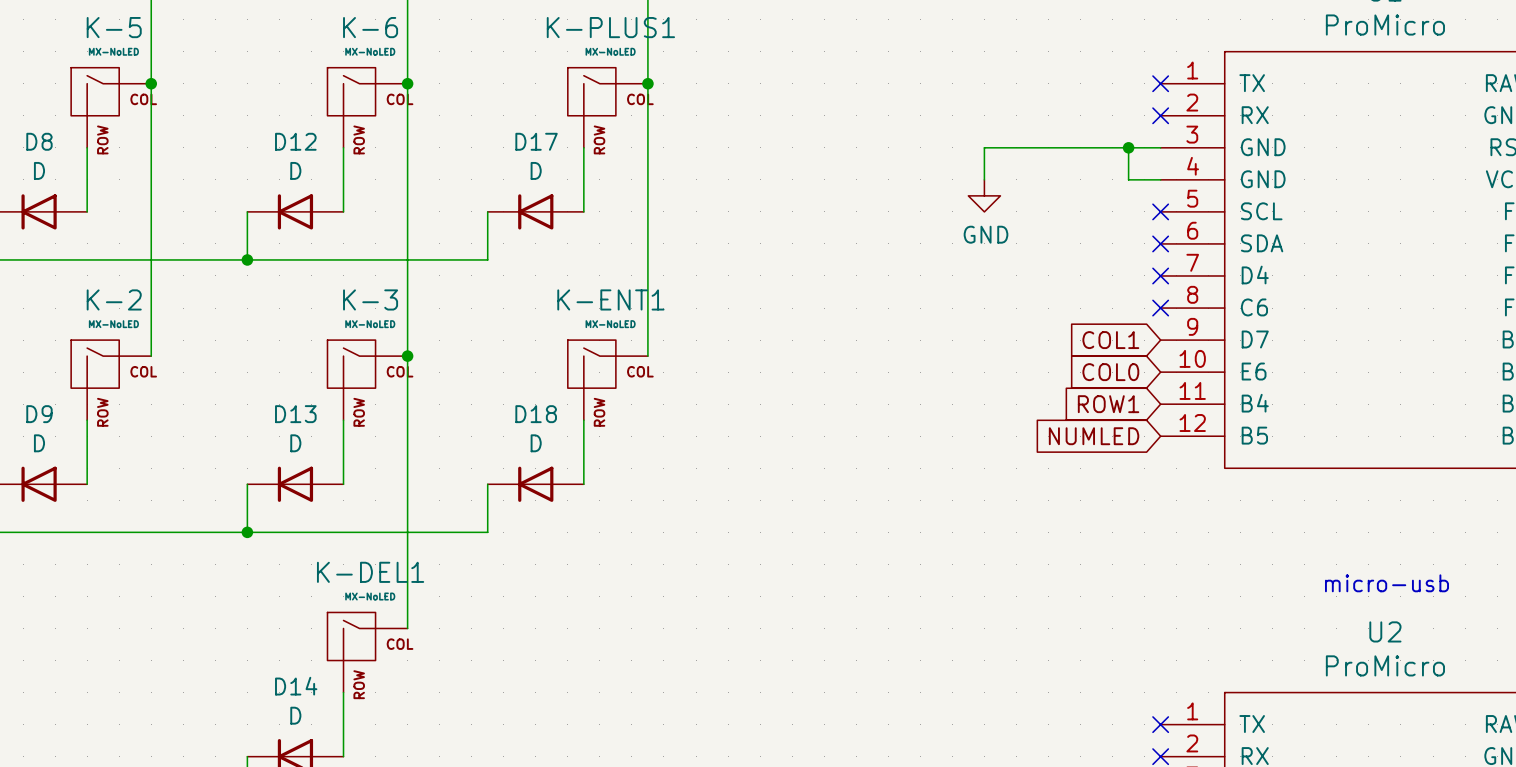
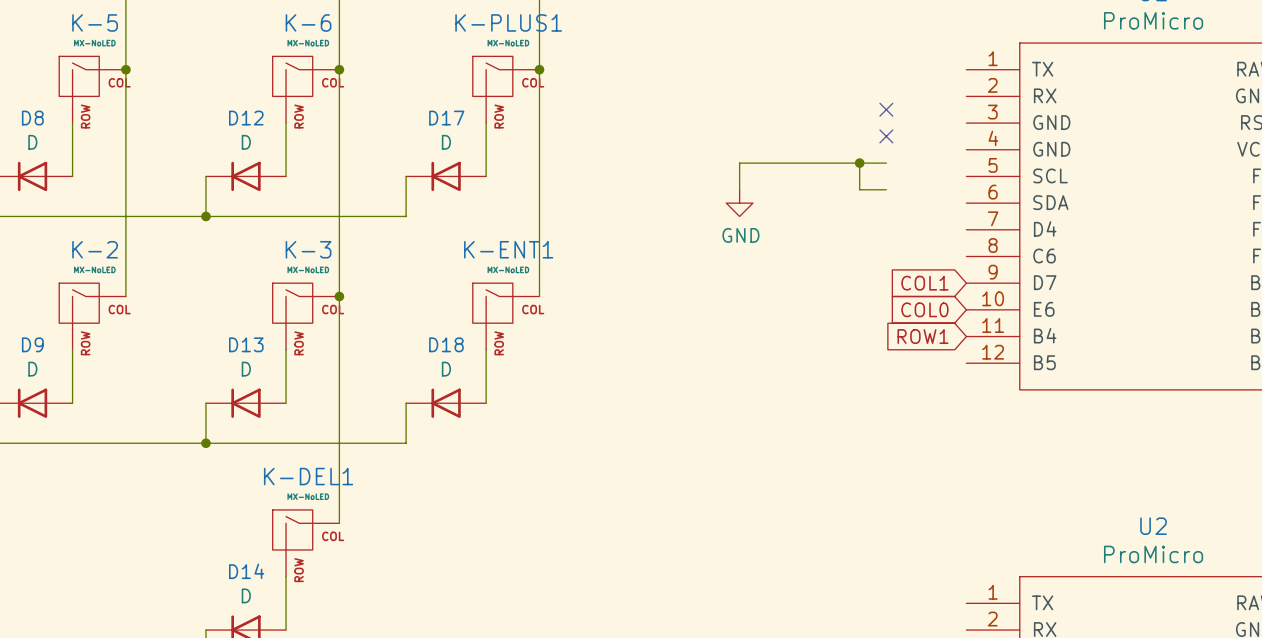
no-connect mark: (1160, 83) -> none
no-connect mark: (1160, 115) -> none
no-connect mark: none -> (886, 109)
wire: (1128, 147) (1128, 179) (1160, 179) -> (859, 163) (859, 189) (886, 189)
junction: (1128, 147) -> none
wire: (1160, 147) (984, 147) (984, 179) -> (886, 163) (739, 163) (739, 189)
no-connect mark: none -> (886, 136)
power symbol position: GND (984, 195) -> GND (739, 203)
junction: none -> (859, 163)
no-connect mark: (1160, 211) -> none
no-connect mark: (1160, 243) -> none
no-connect mark: (1160, 275) -> none
no-connect mark: (1160, 308) -> none
global label: NUMLED (1094, 436) -> none
text: micro-usb (1386, 583) -> none
no-connect mark: (1160, 724) -> none
no-connect mark: (1160, 756) -> none

